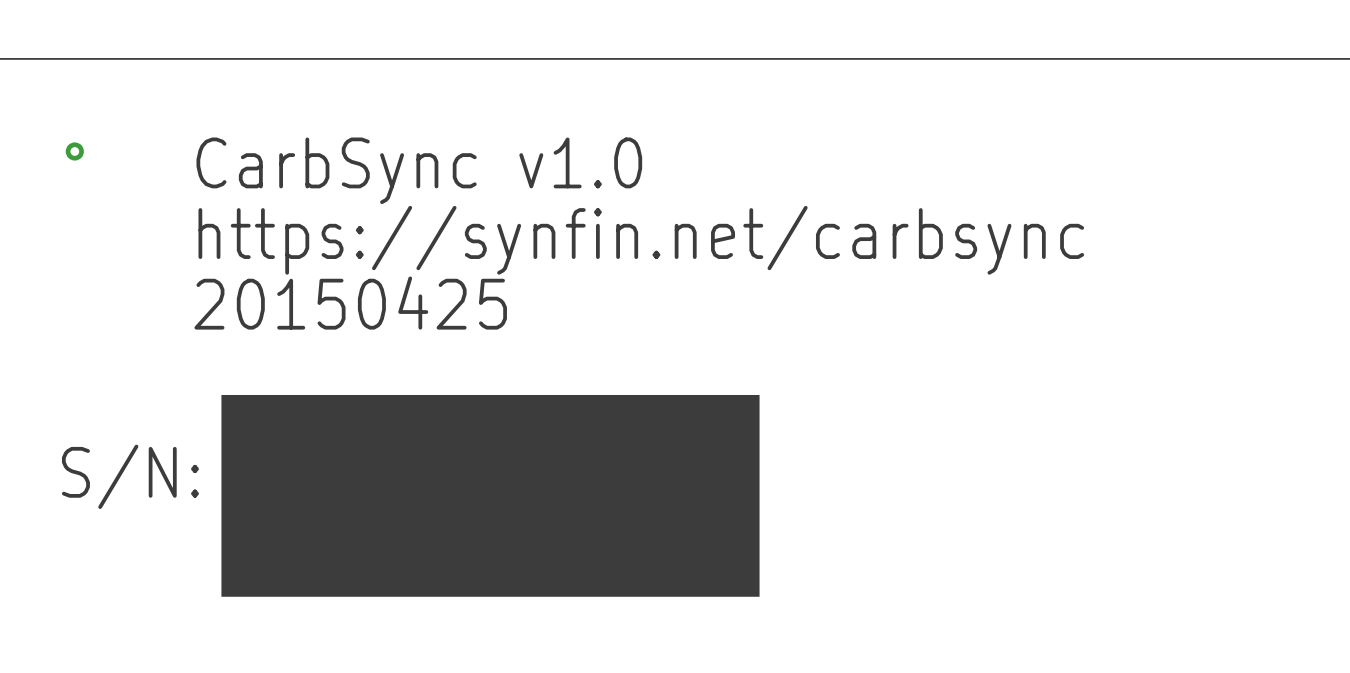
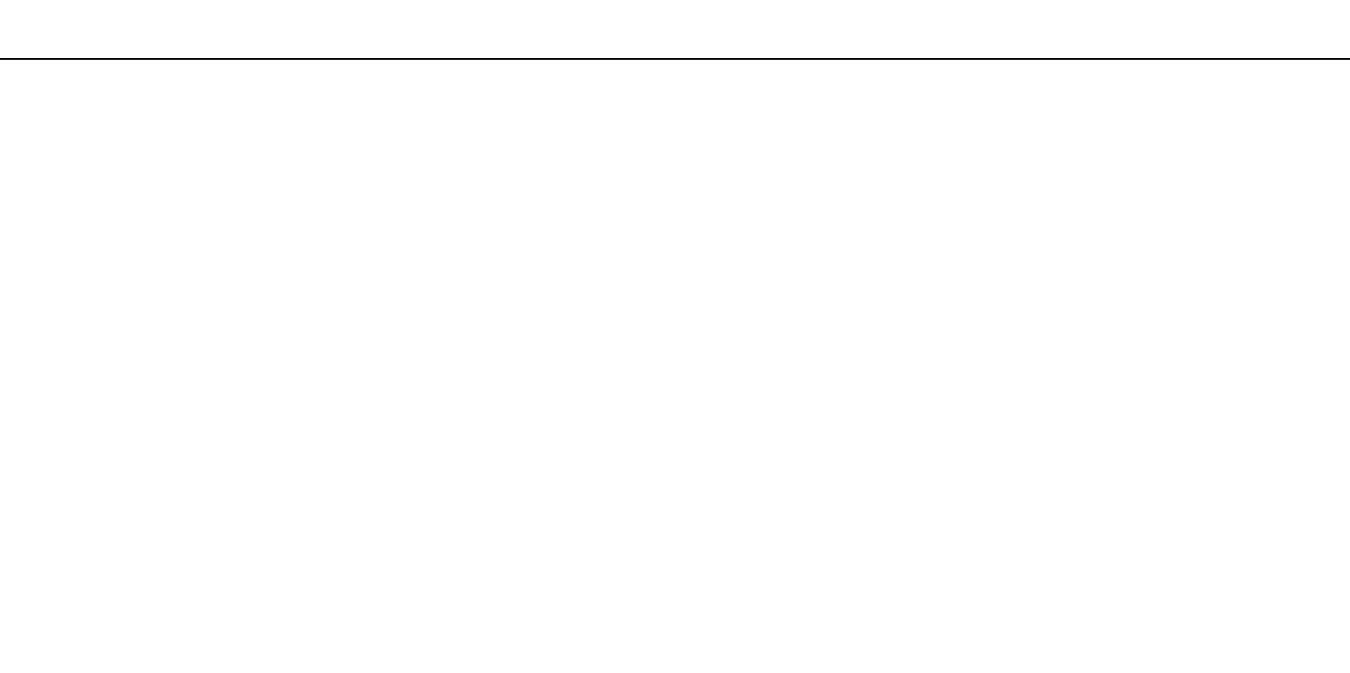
via: (74, 151) -> none
text: CarbSync v1.0 (419, 170) -> none
text: https://synfin.net/carbsync (641, 240) -> none
text: 20150425 (350, 303) -> none
drawing: [221, 394, 760, 597] -> none
text: S/N: (130, 476) -> none

